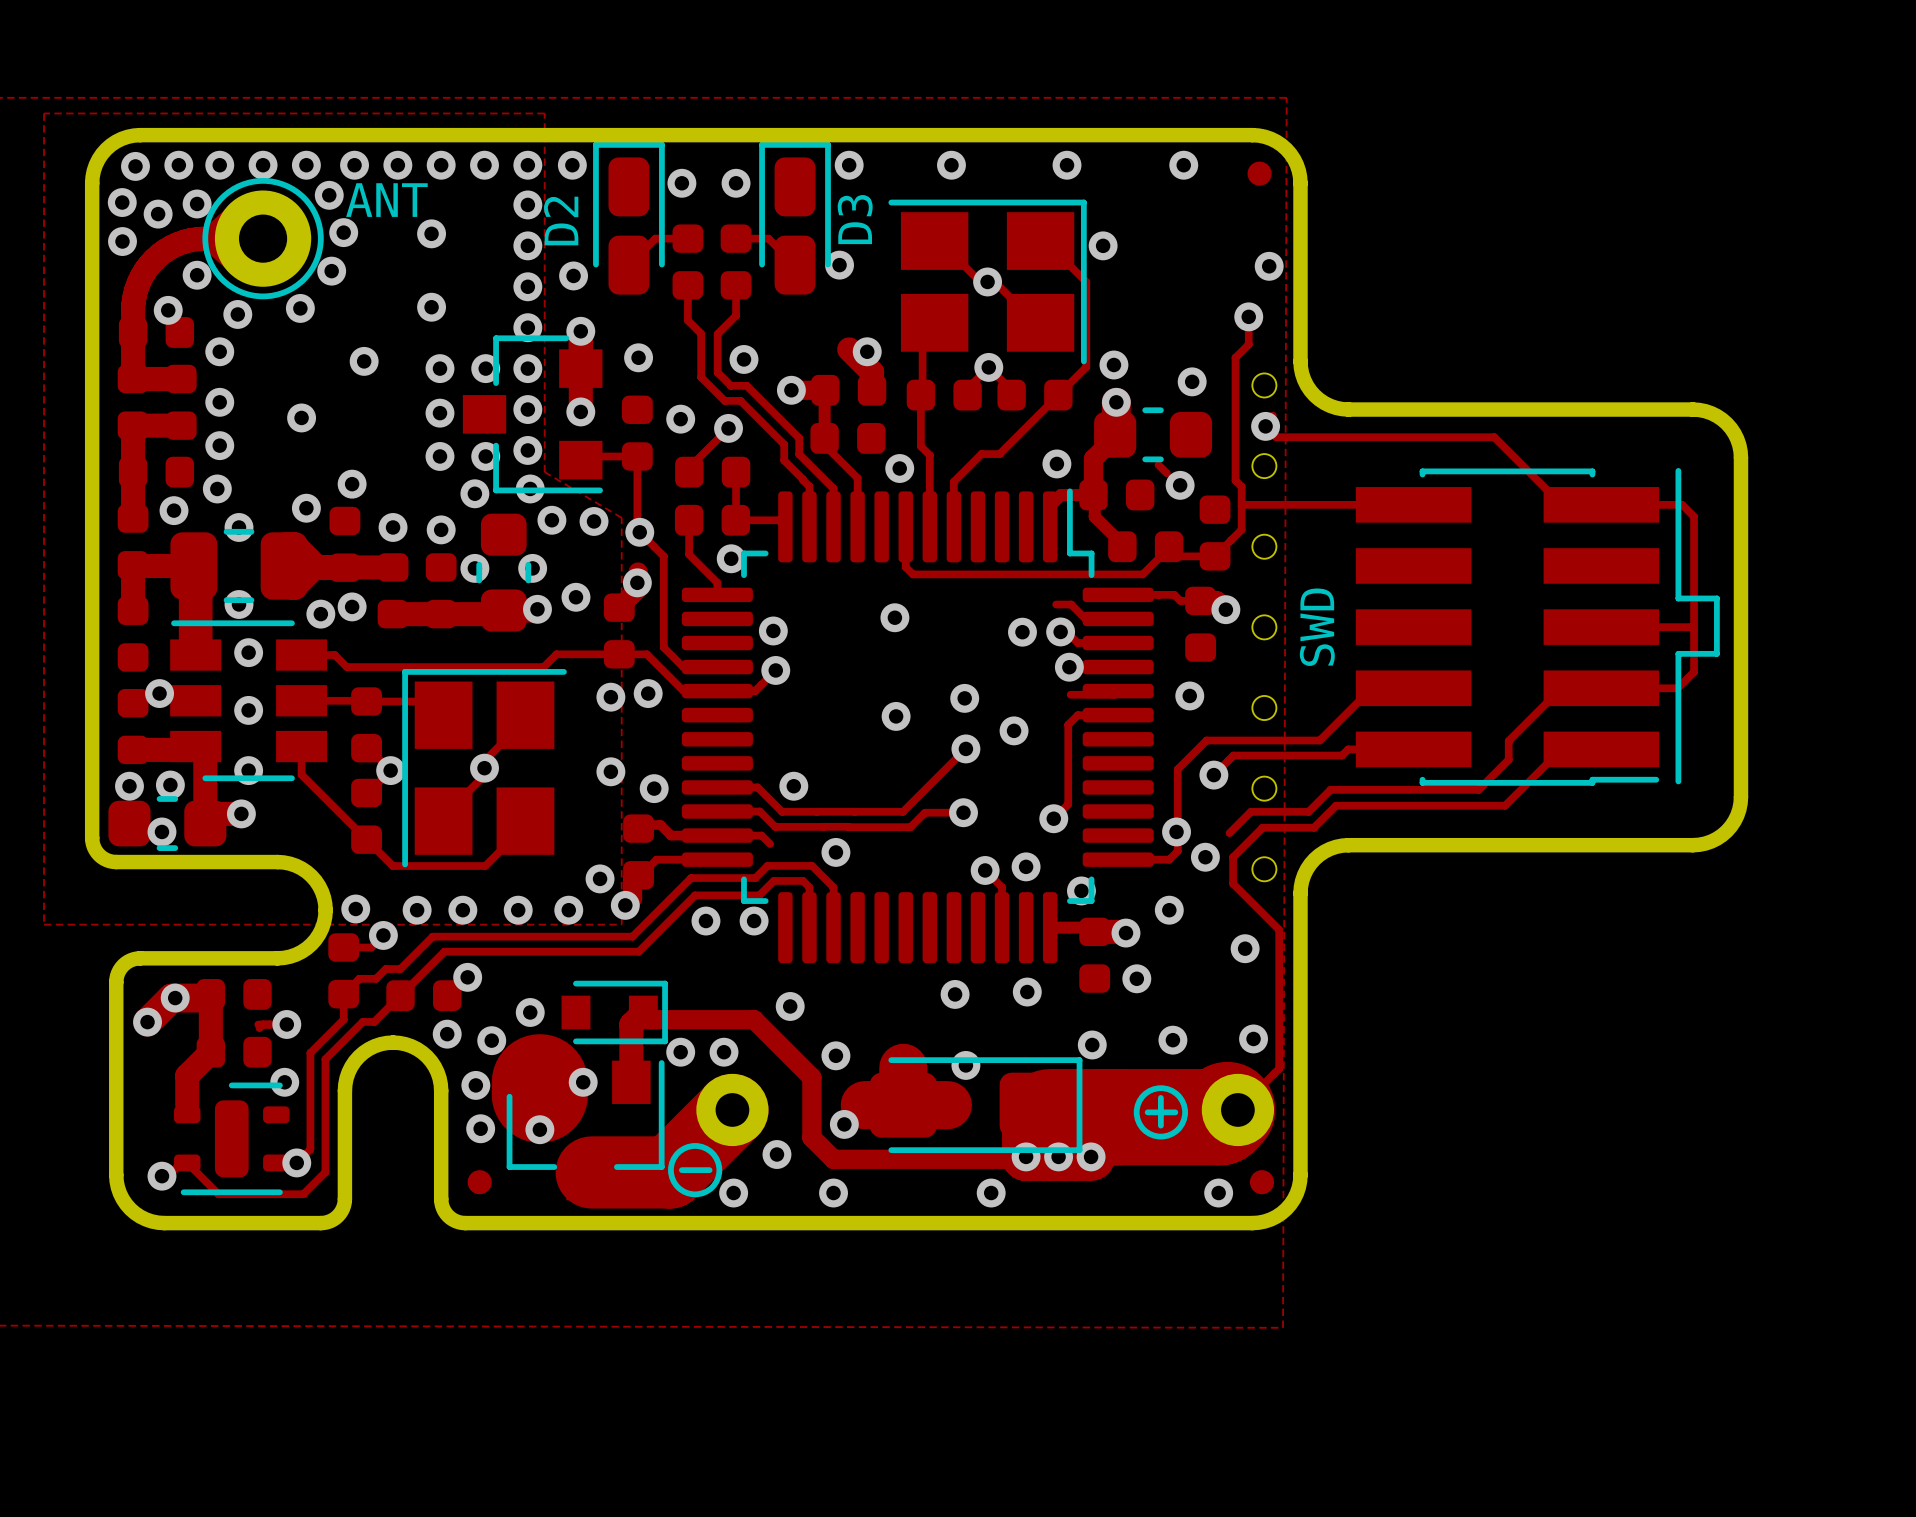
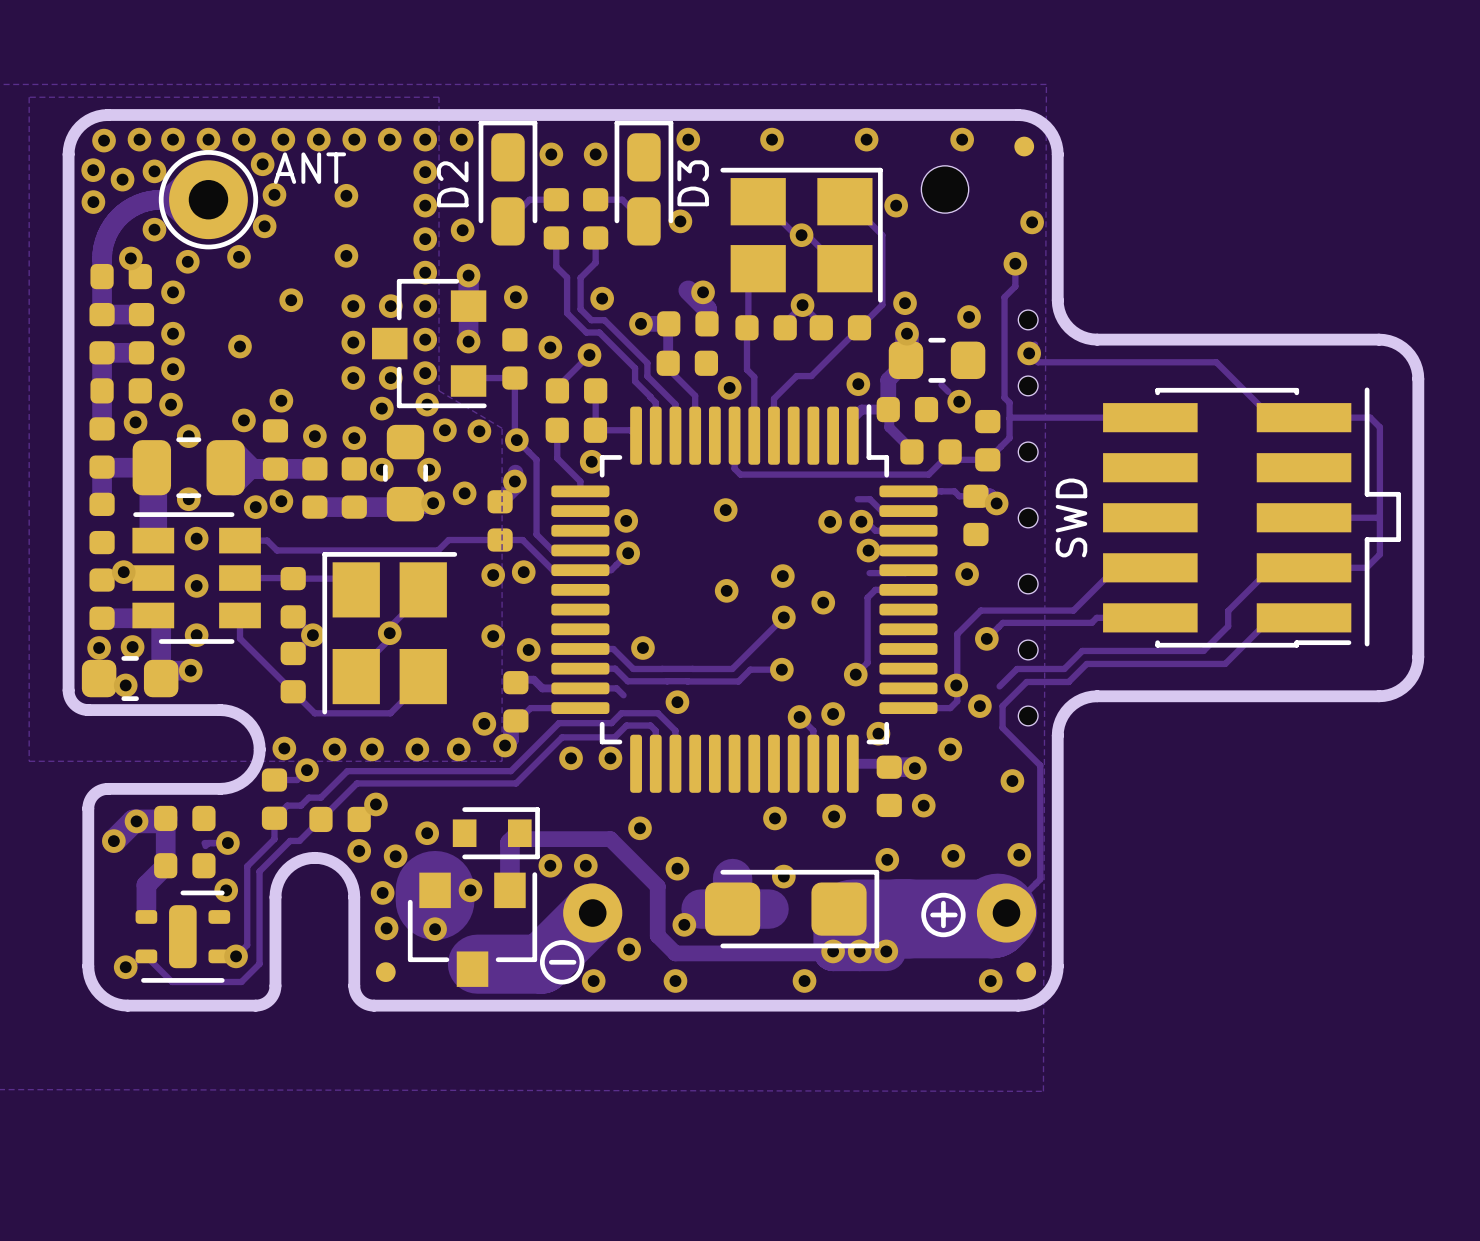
part: none -> (945, 189)

